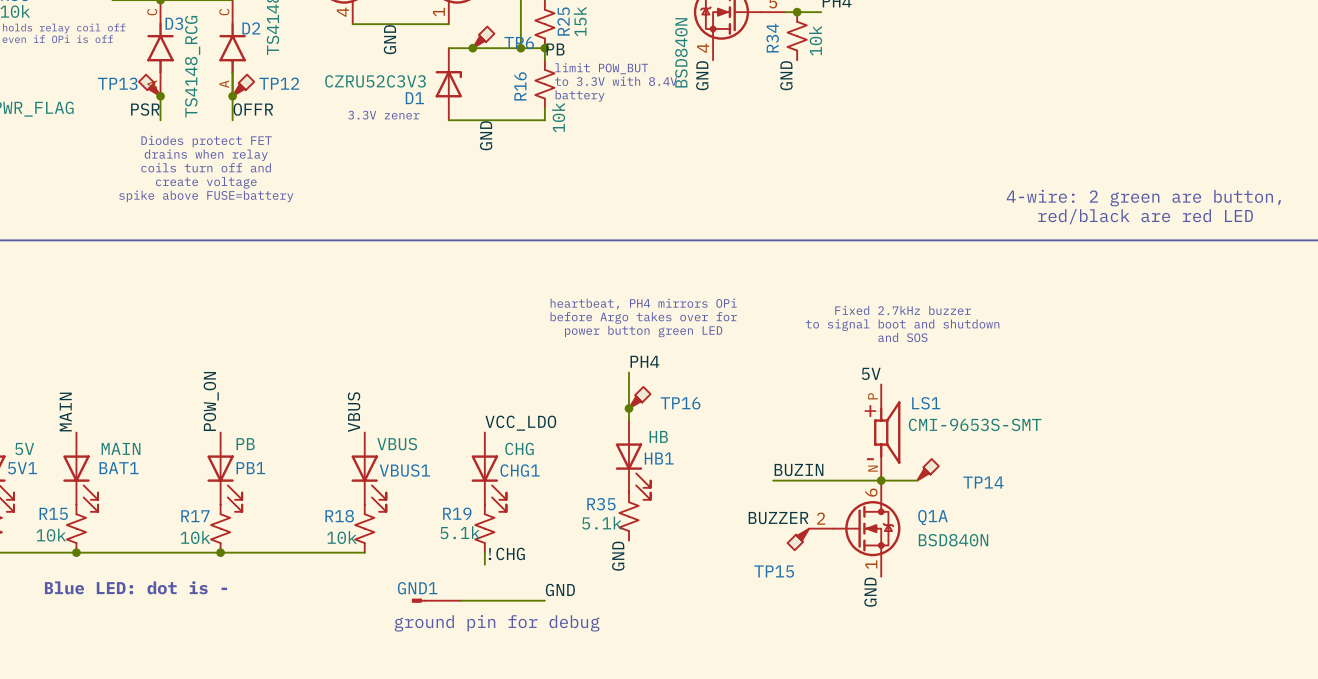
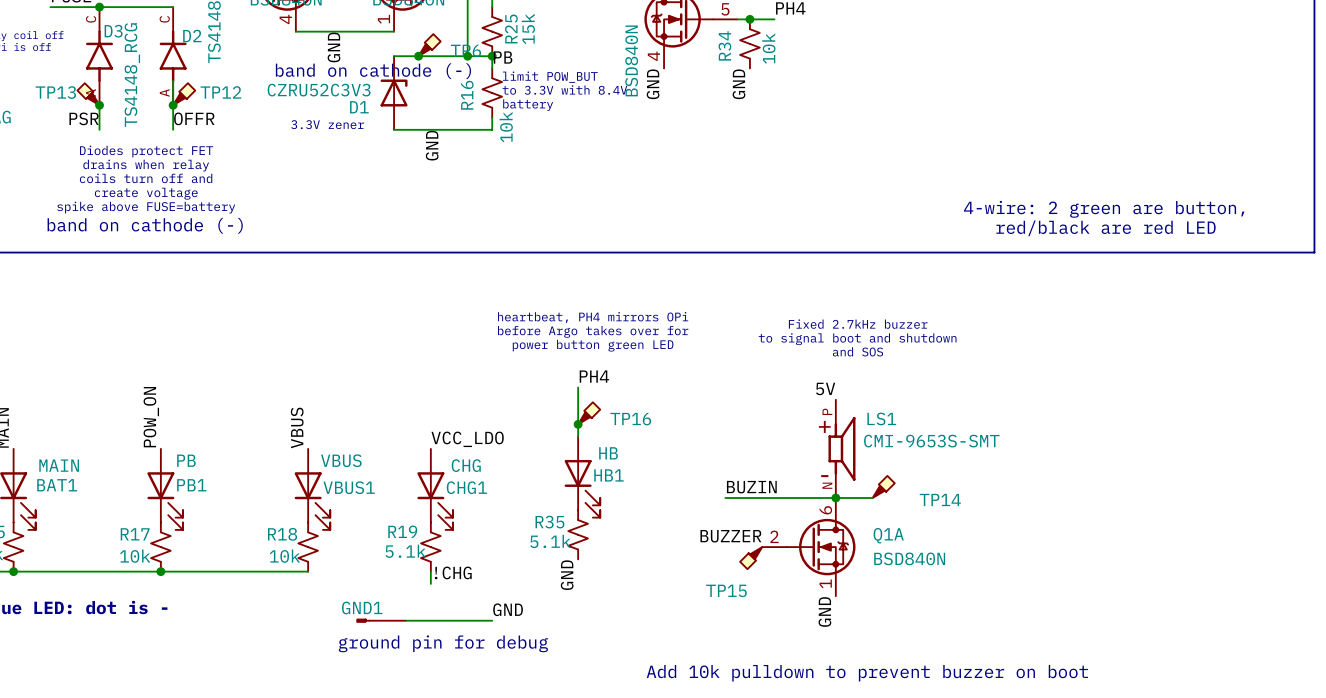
text: none -> band on cathode (-) (373, 71)
text: none -> band on cathode (-) (145, 225)
text: none -> Add 10k pulldown to prevent buzzer on boot (867, 673)

